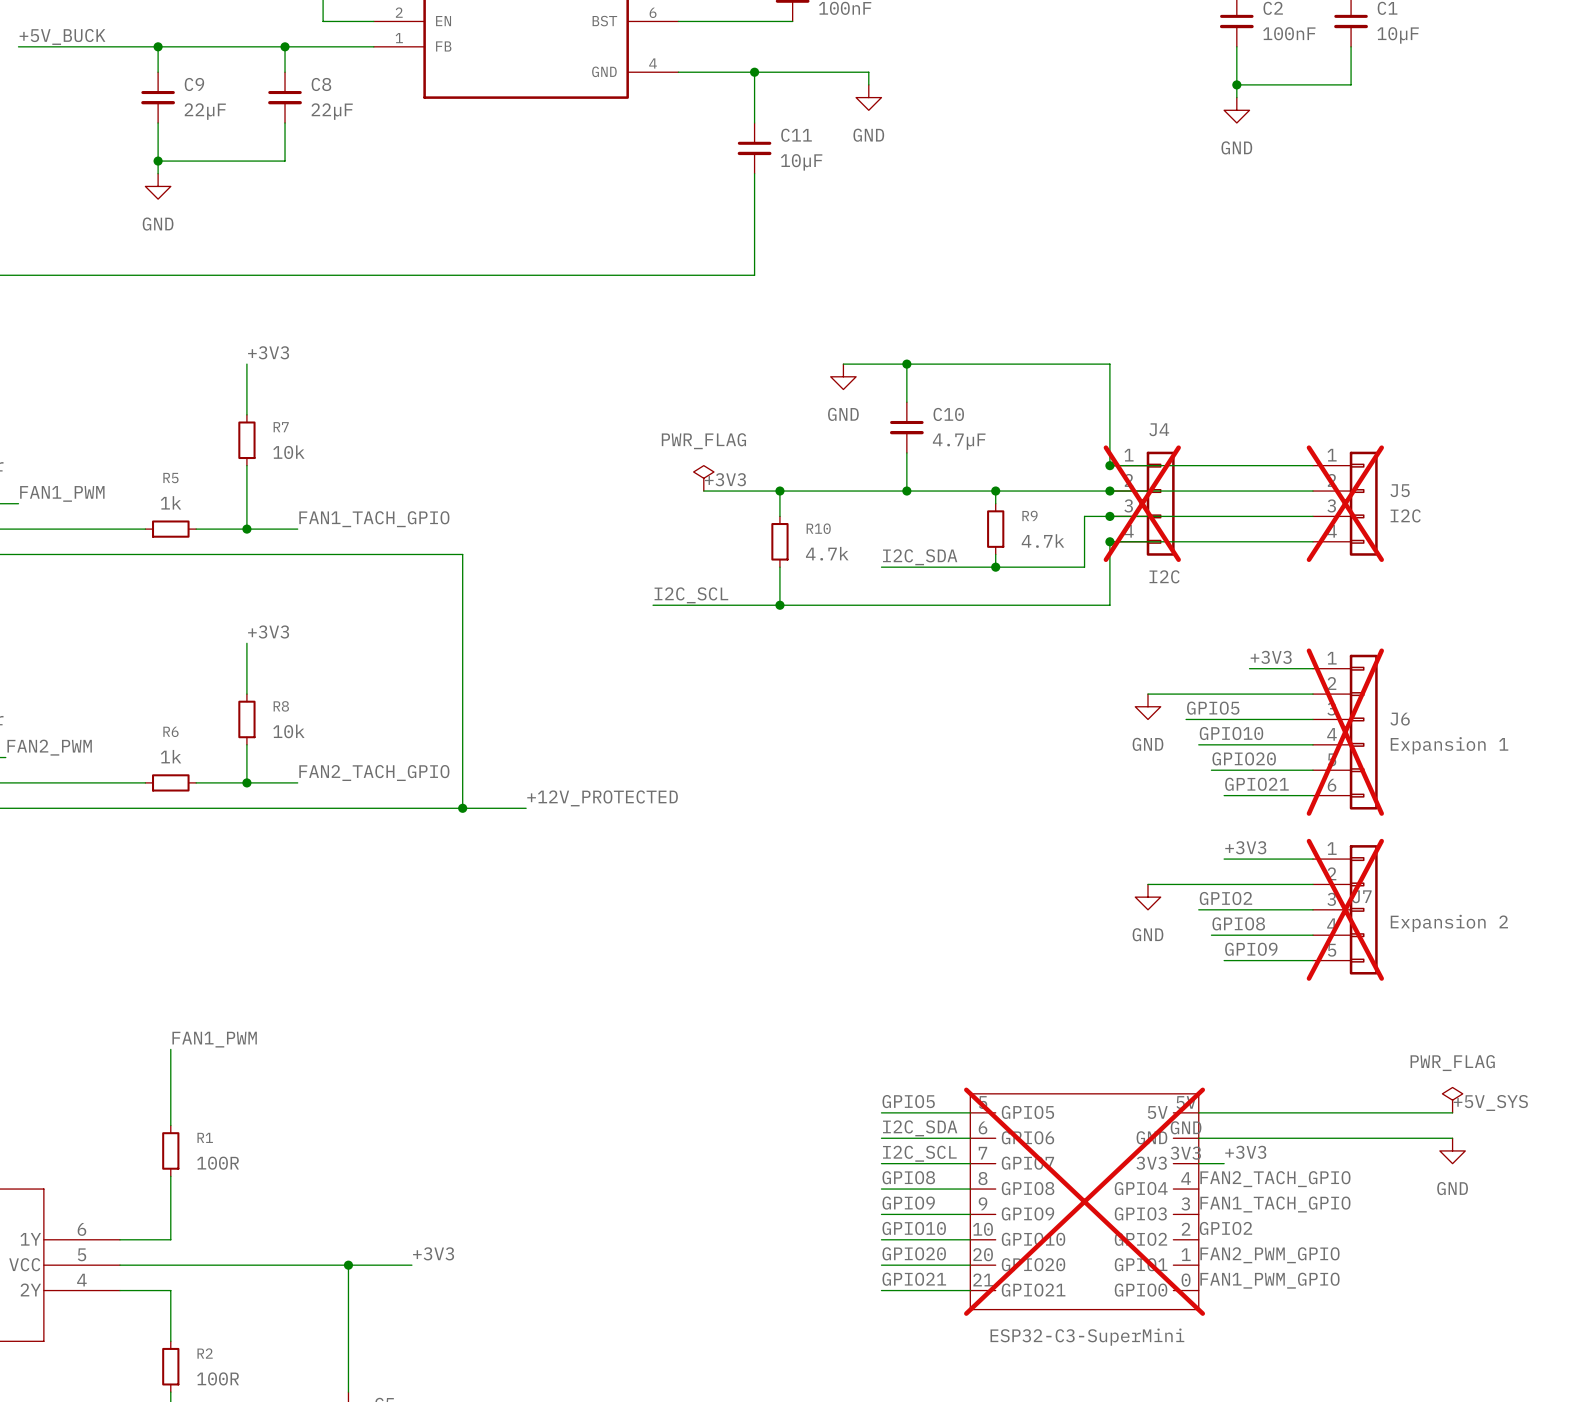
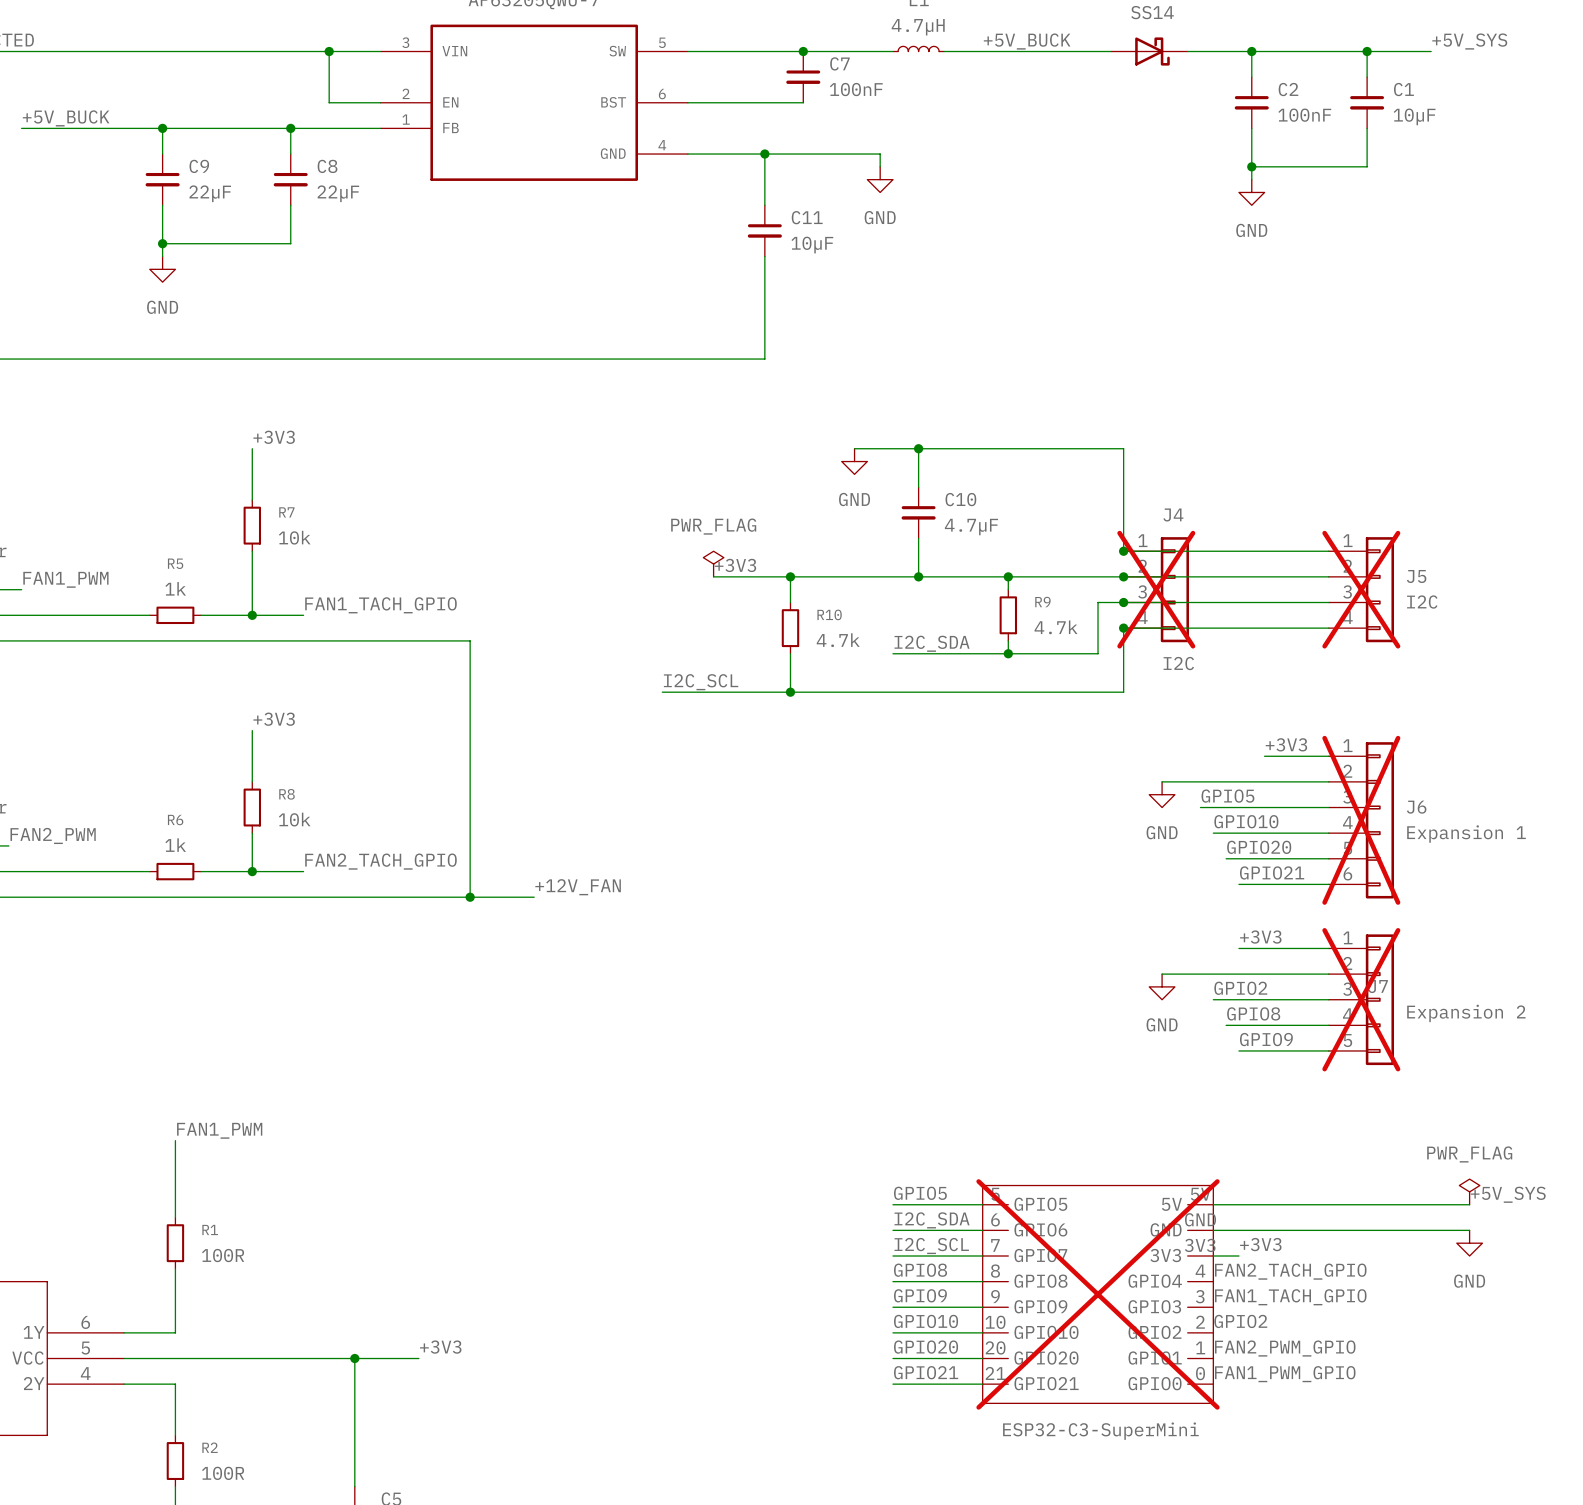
label: +12V_PROTECTED (602, 798) -> +12V_FAN (578, 887)

